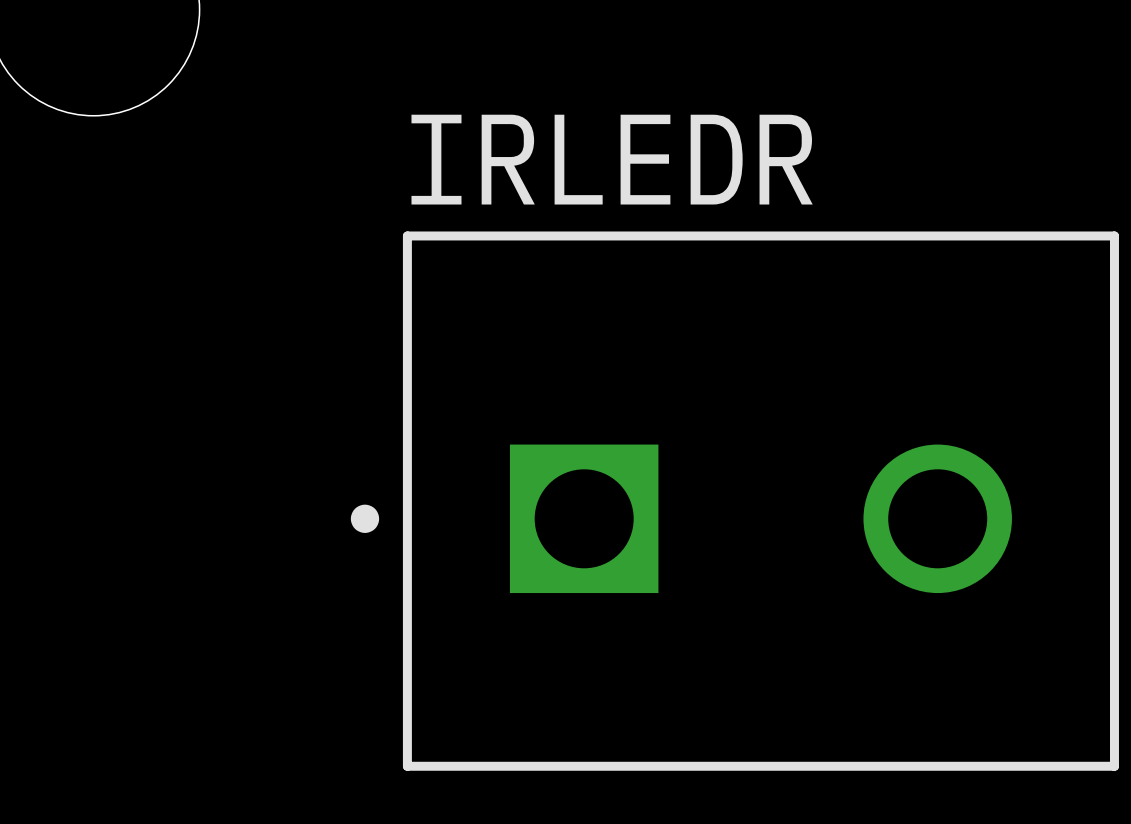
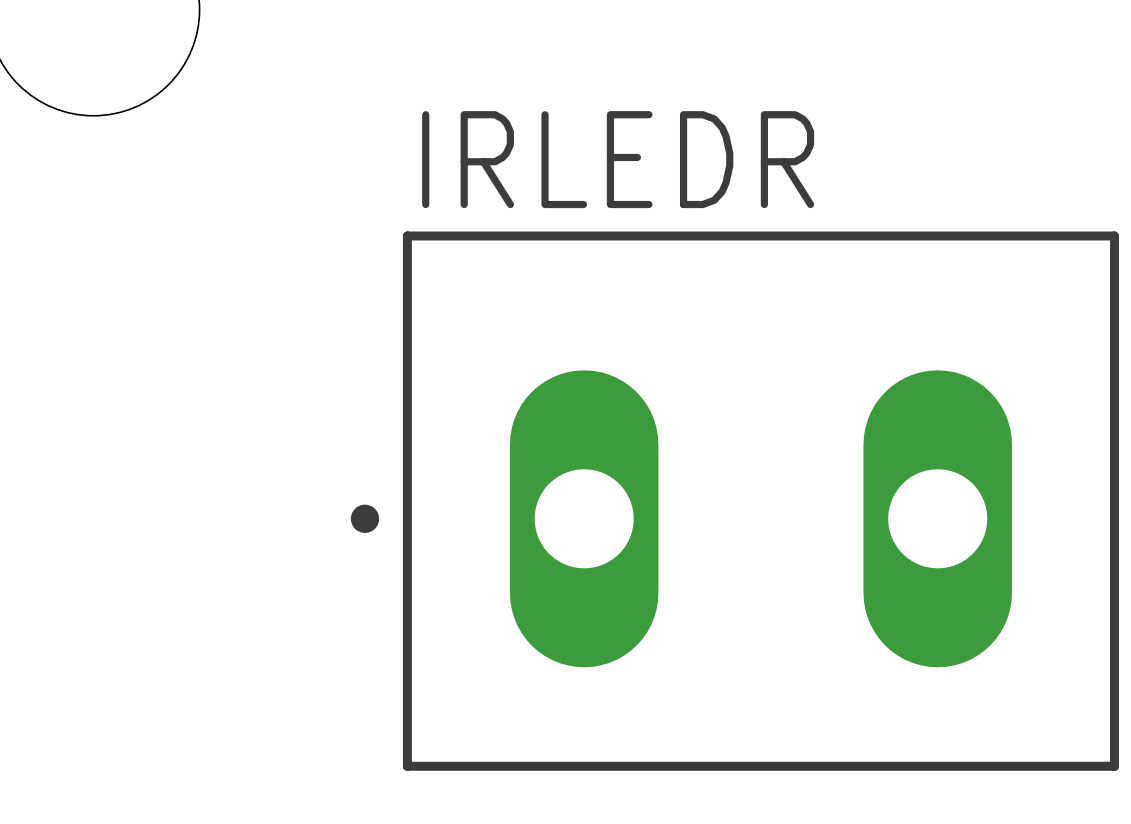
IRLEDR footprint: [350, 231, 1119, 771] -> [350, 231, 1119, 771]

